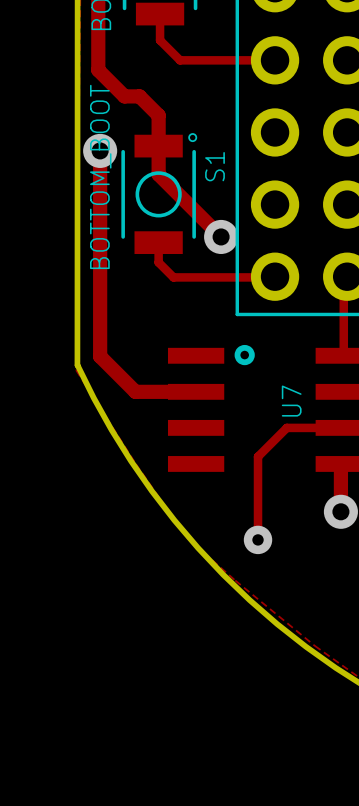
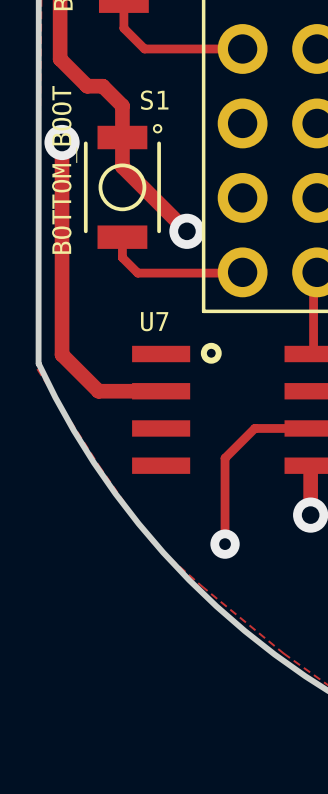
S1 name rotation: 0° (215, 166) -> 90° clockwise (154, 100)
S1 name position: S1 (215, 166) -> S1 (154, 100)
U7 name rotation: 0° (291, 401) -> 90° clockwise (154, 321)
U7 name position: U7 (291, 401) -> U7 (154, 321)

